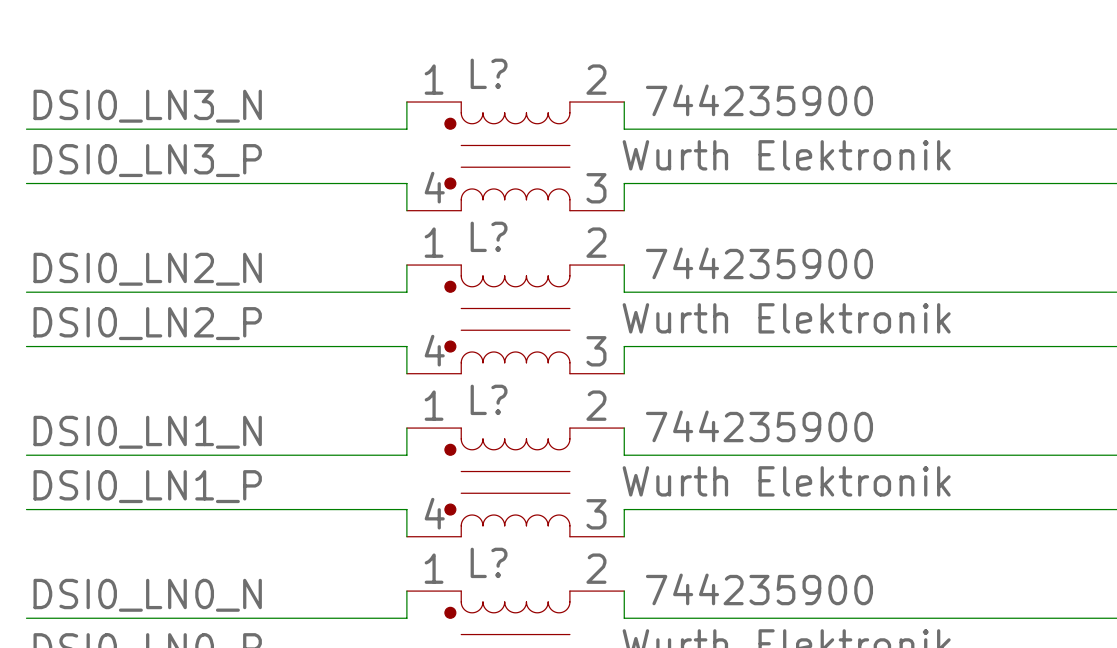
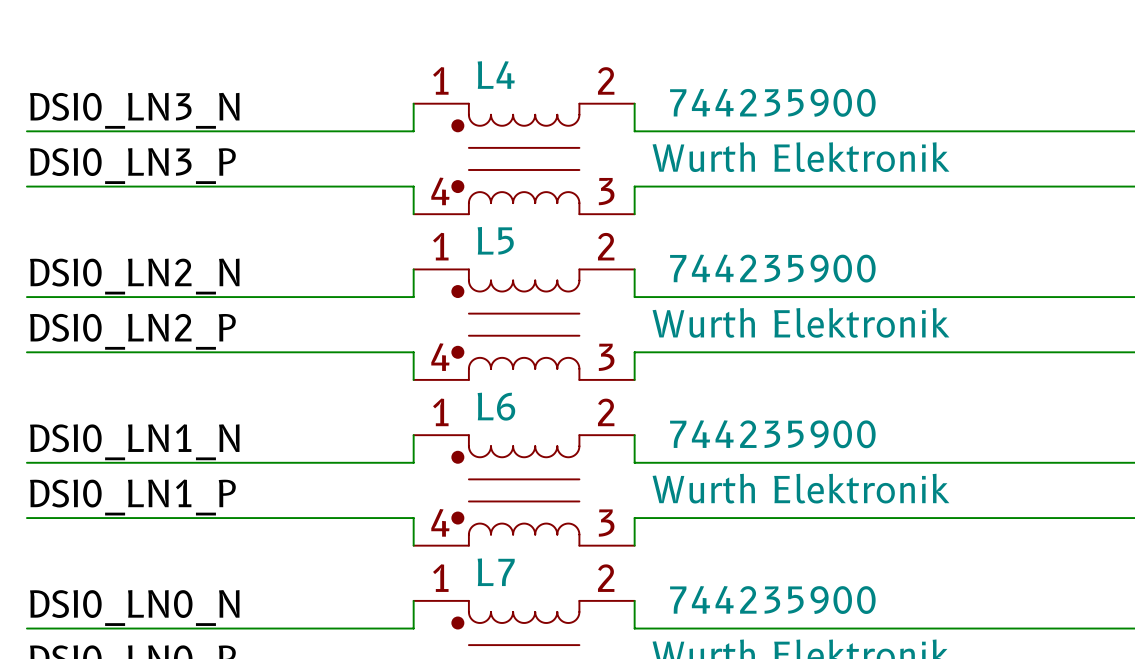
L? name: L? (489, 73) -> L4 (496, 75)
L? name: L? (489, 236) -> L5 (495, 240)
L? name: L? (489, 399) -> L6 (496, 406)
L? name: L? (489, 562) -> L7 (496, 572)

